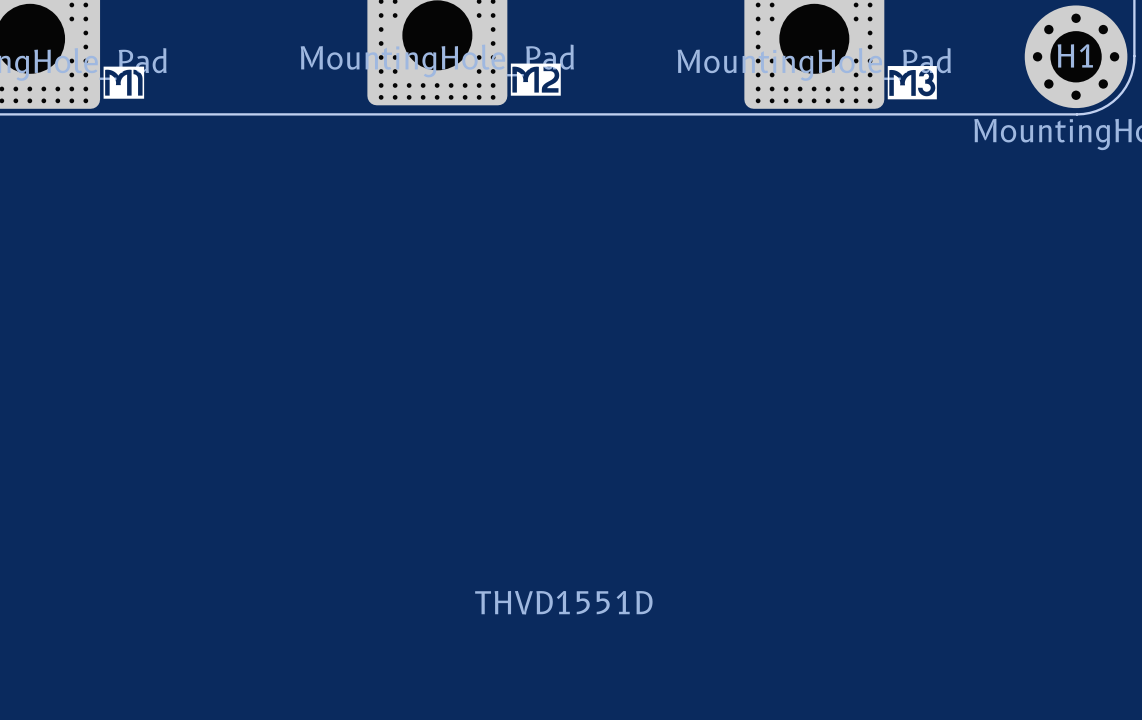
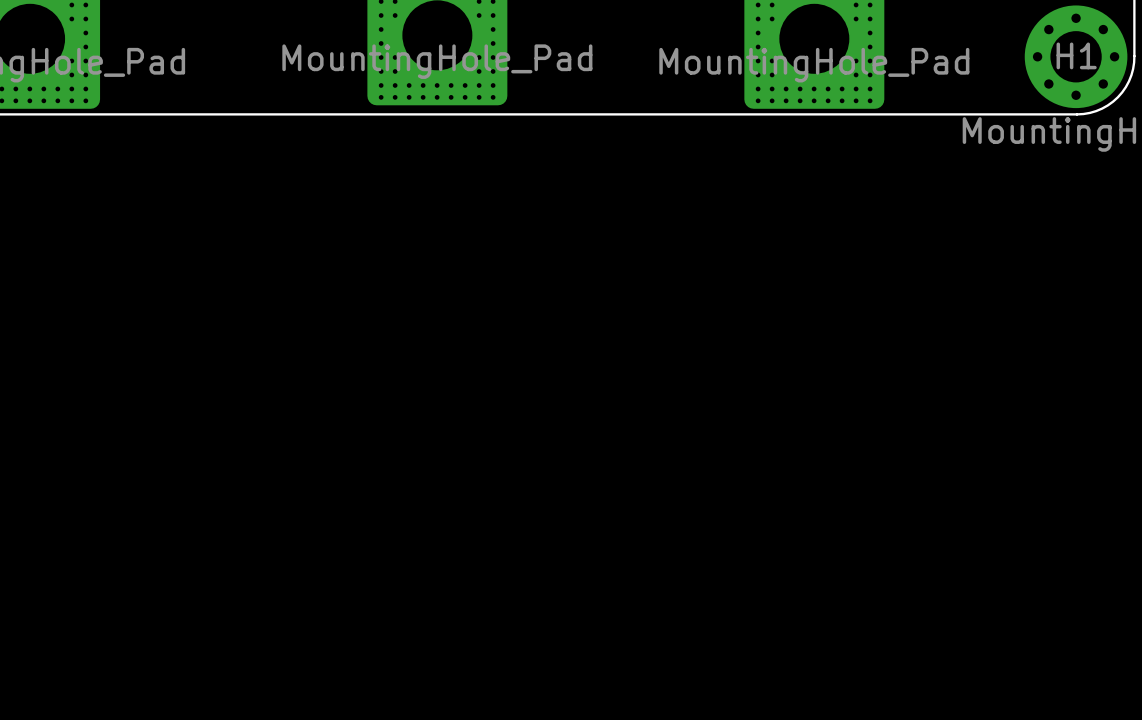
drawing: [510, 63, 561, 96] -> none
drawing: [103, 66, 145, 99] -> none
drawing: [887, 66, 937, 100] -> none
part: THVD1551D (563, 602) -> none

